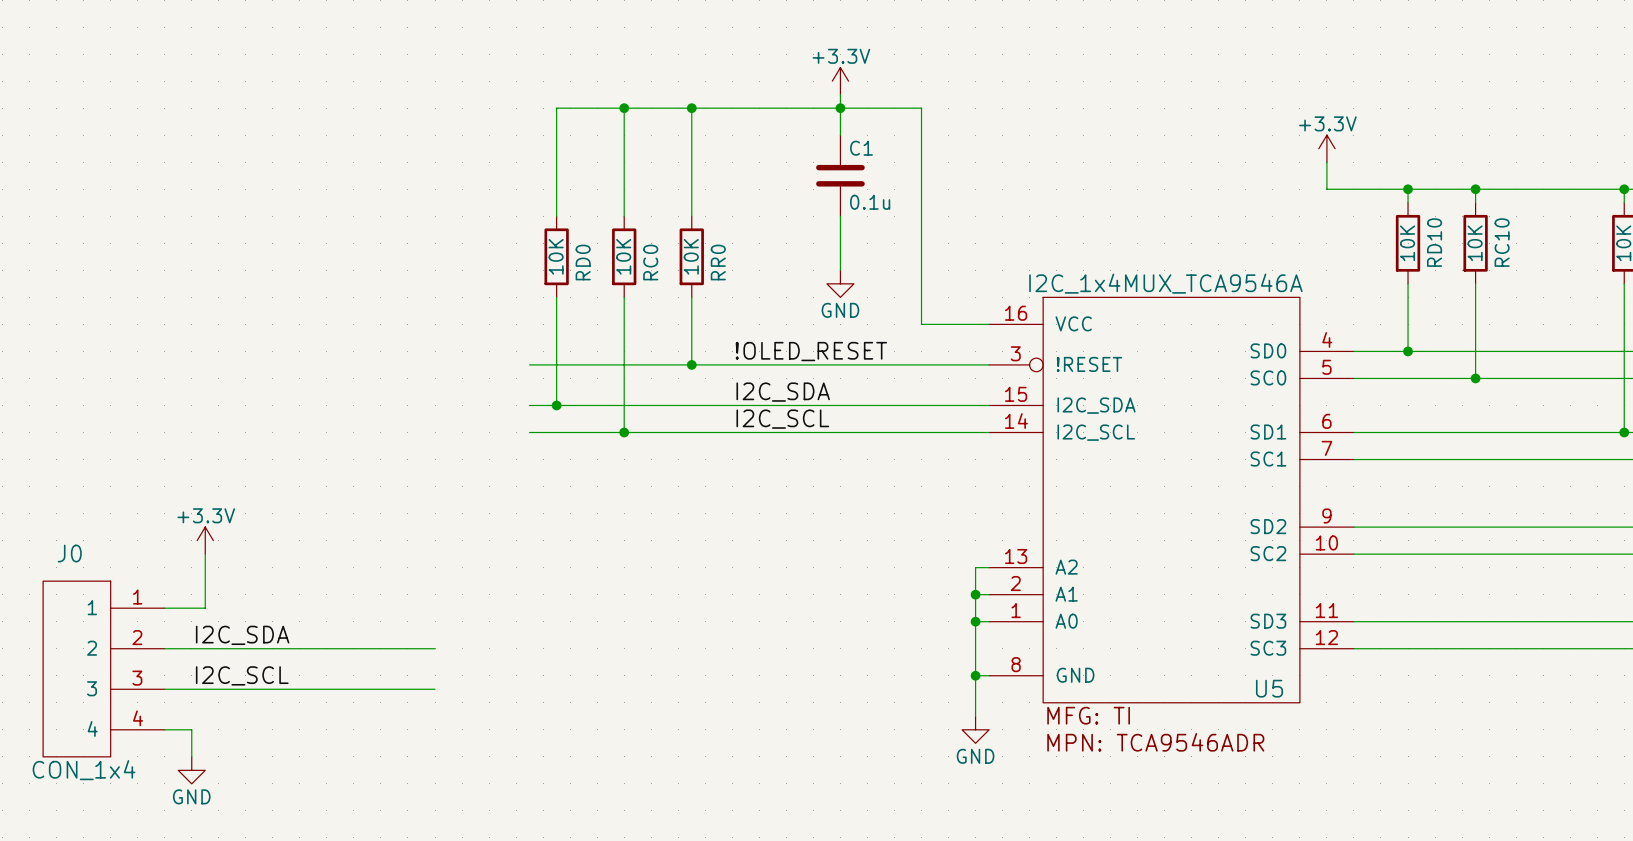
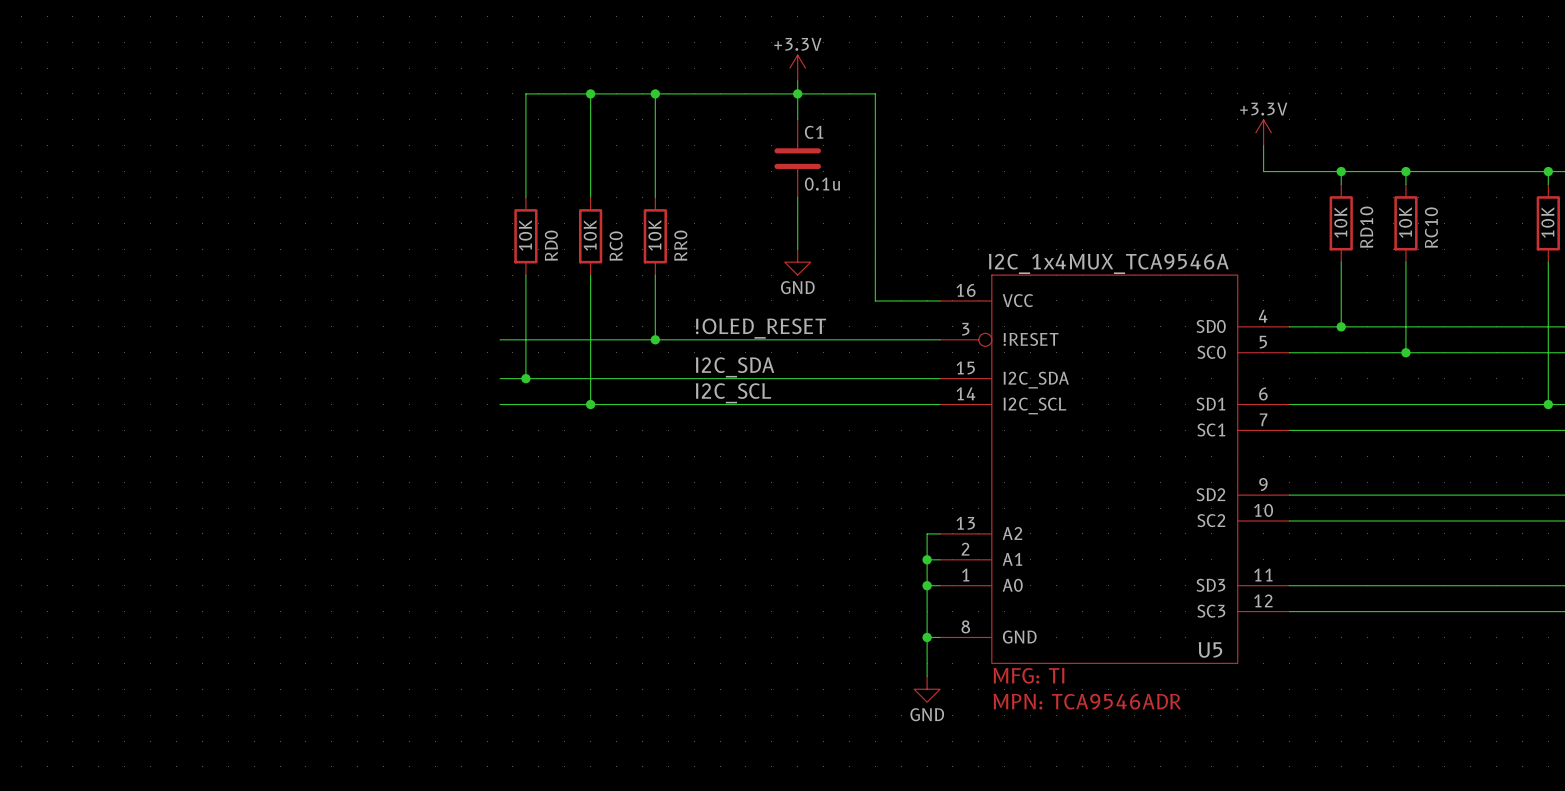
power symbol: +3.3V (205, 540) -> none
wire: (205, 554) (205, 608) (164, 608) -> none
label: I2C_SDA (242, 635) -> none
wire: (164, 648) (435, 648) -> none
J0: CON_1x4 (103, 669) -> none
label: I2C_SCL (242, 675) -> none
wire: (164, 689) (435, 689) -> none
wire: (164, 729) (191, 729) (191, 756) -> none
power symbol: GND (191, 770) -> none

